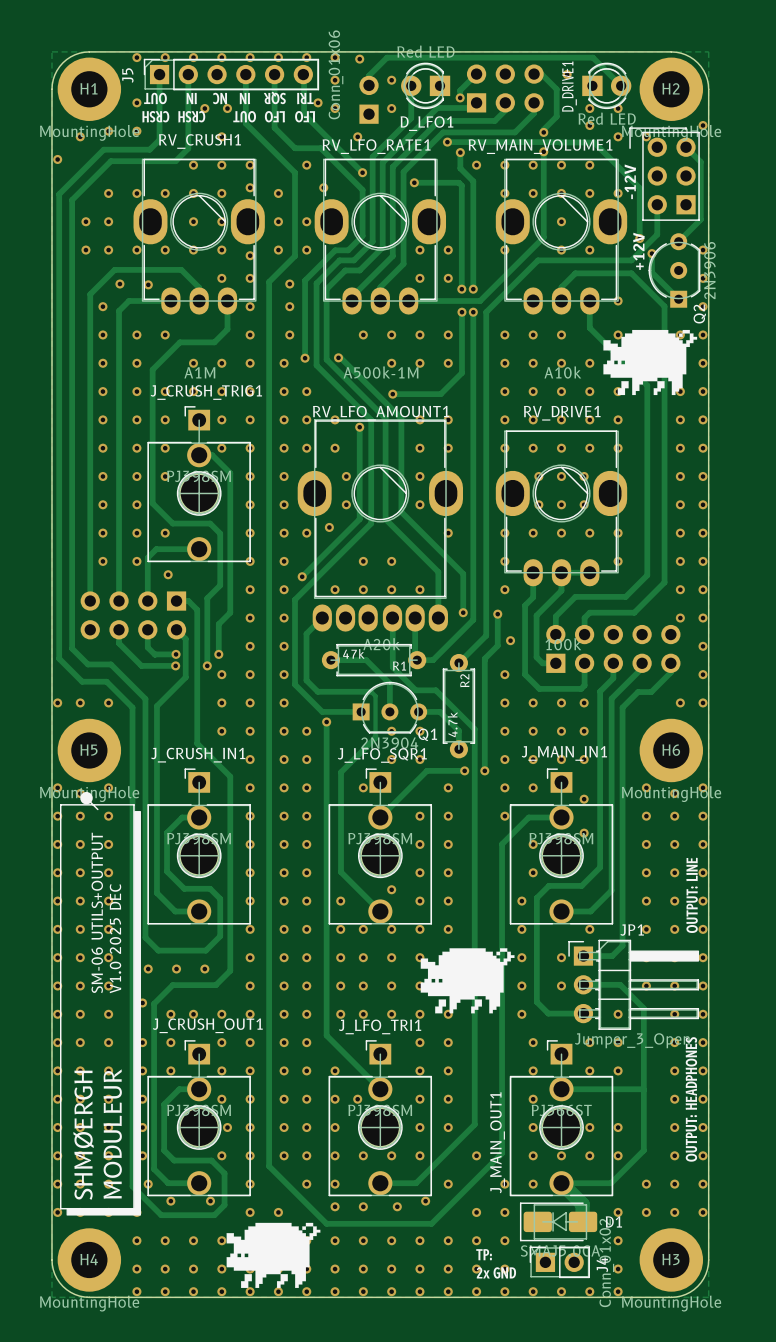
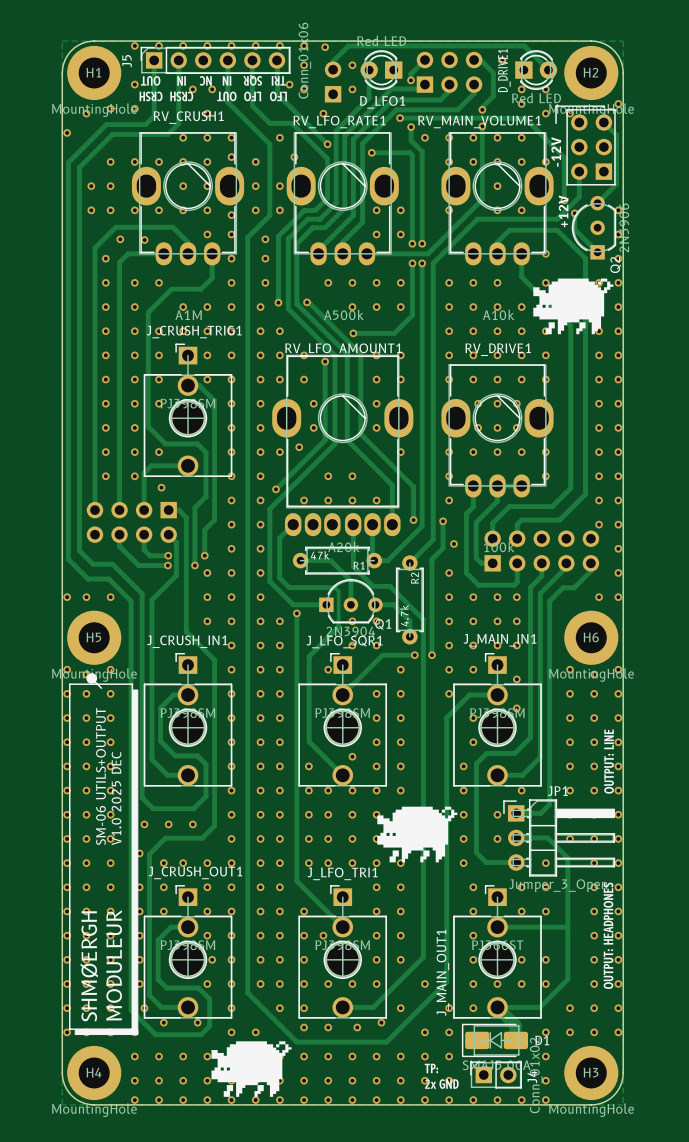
RV_LFO_RATE1 value: A500k-1M (380, 372) -> A500k (343, 314)

